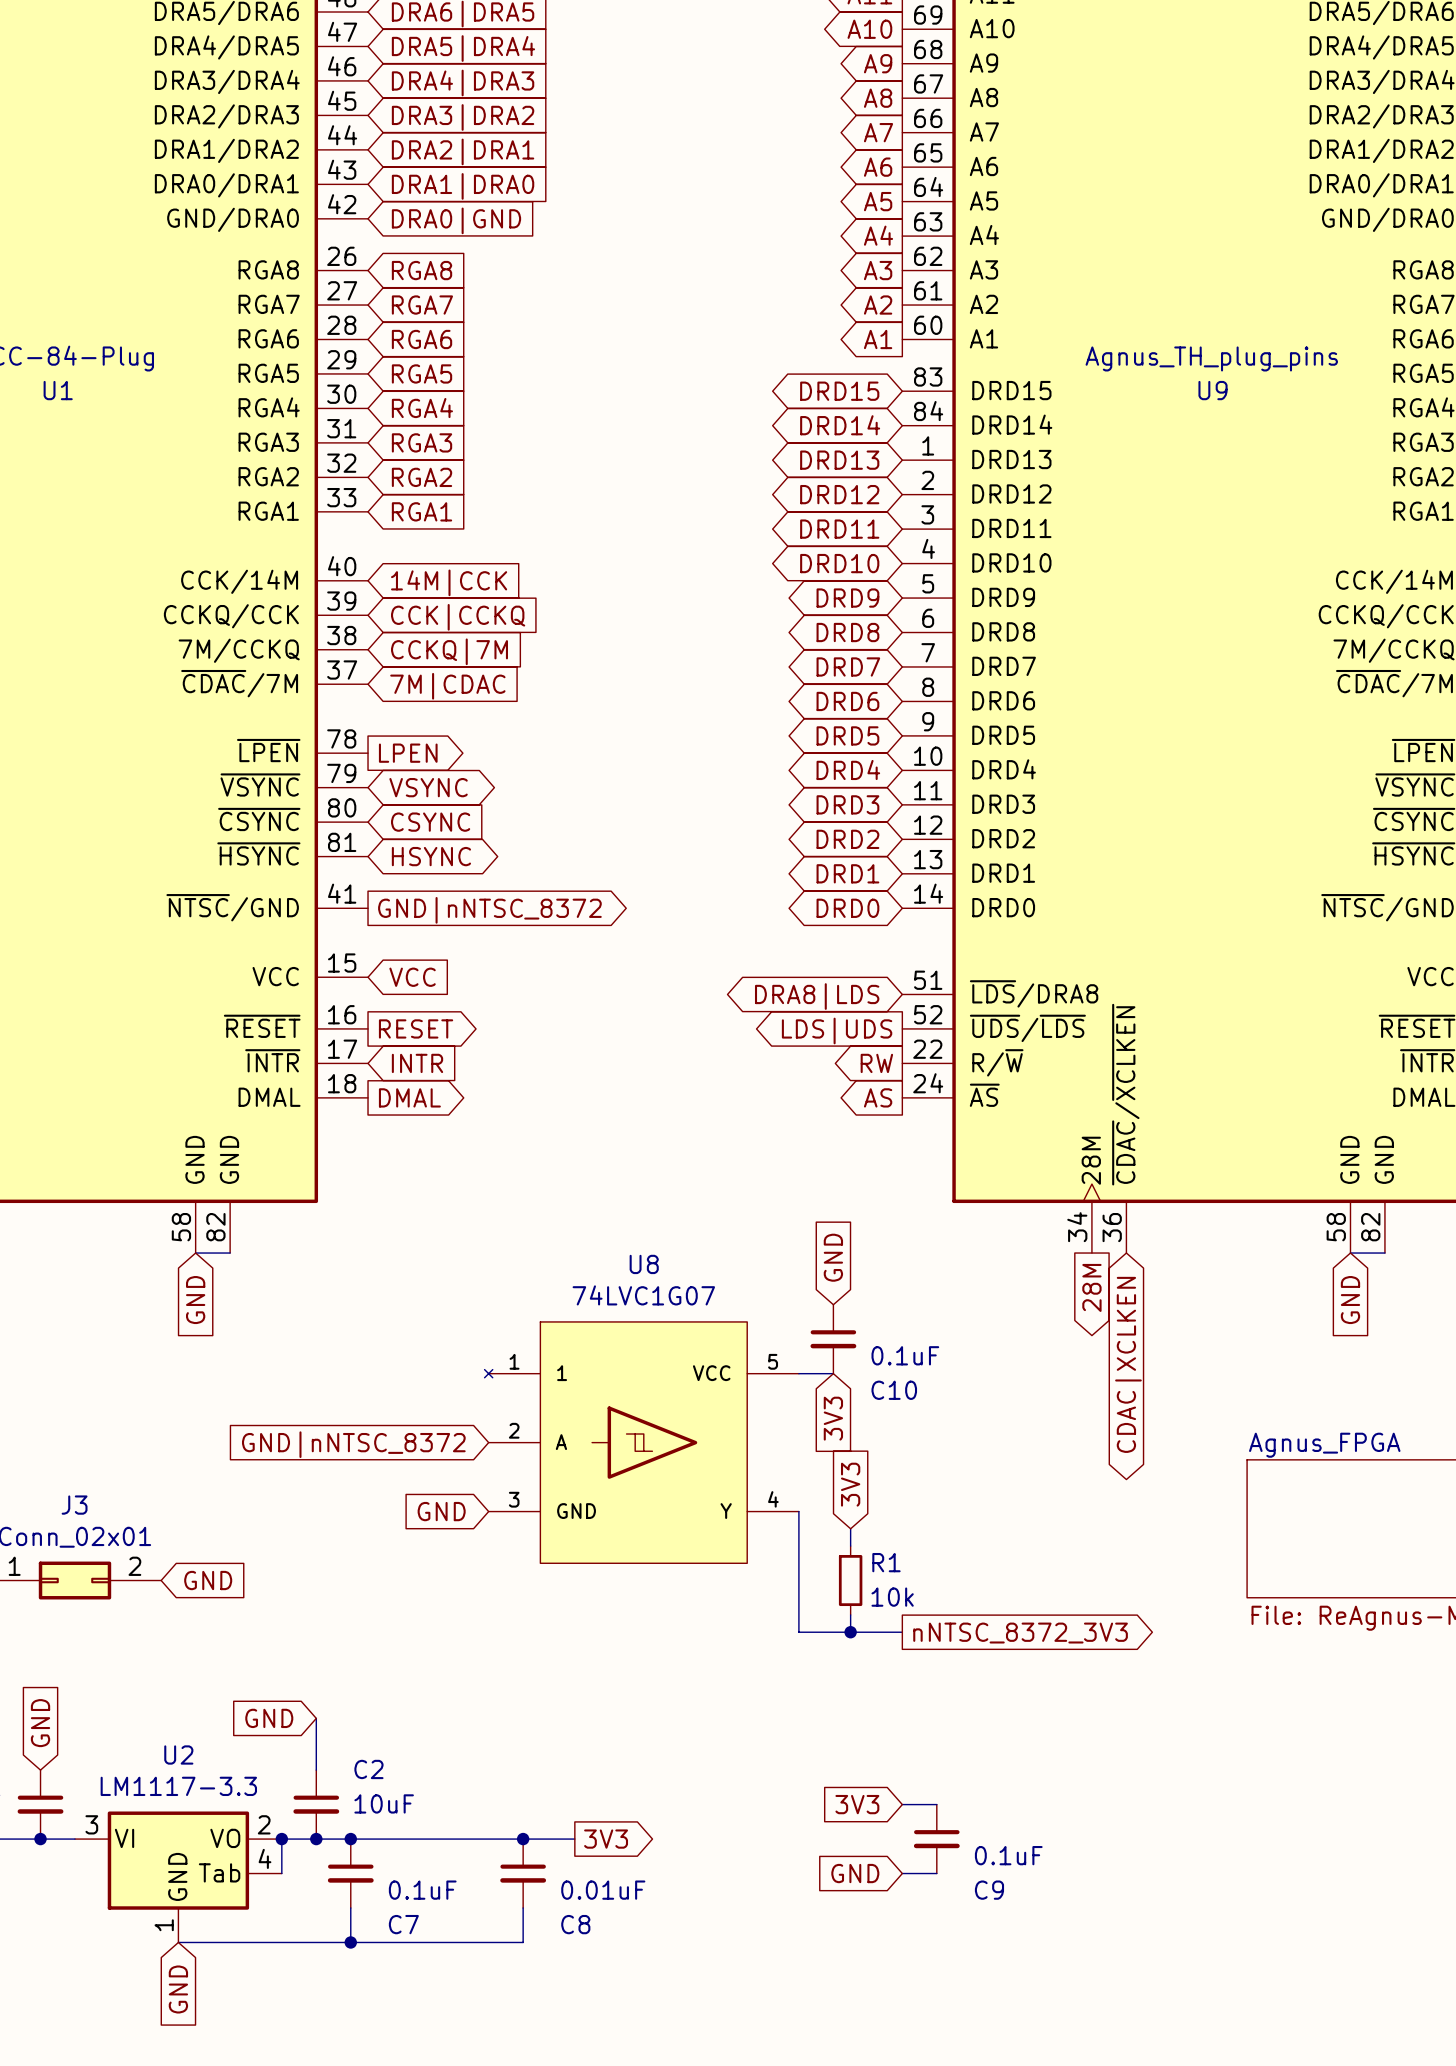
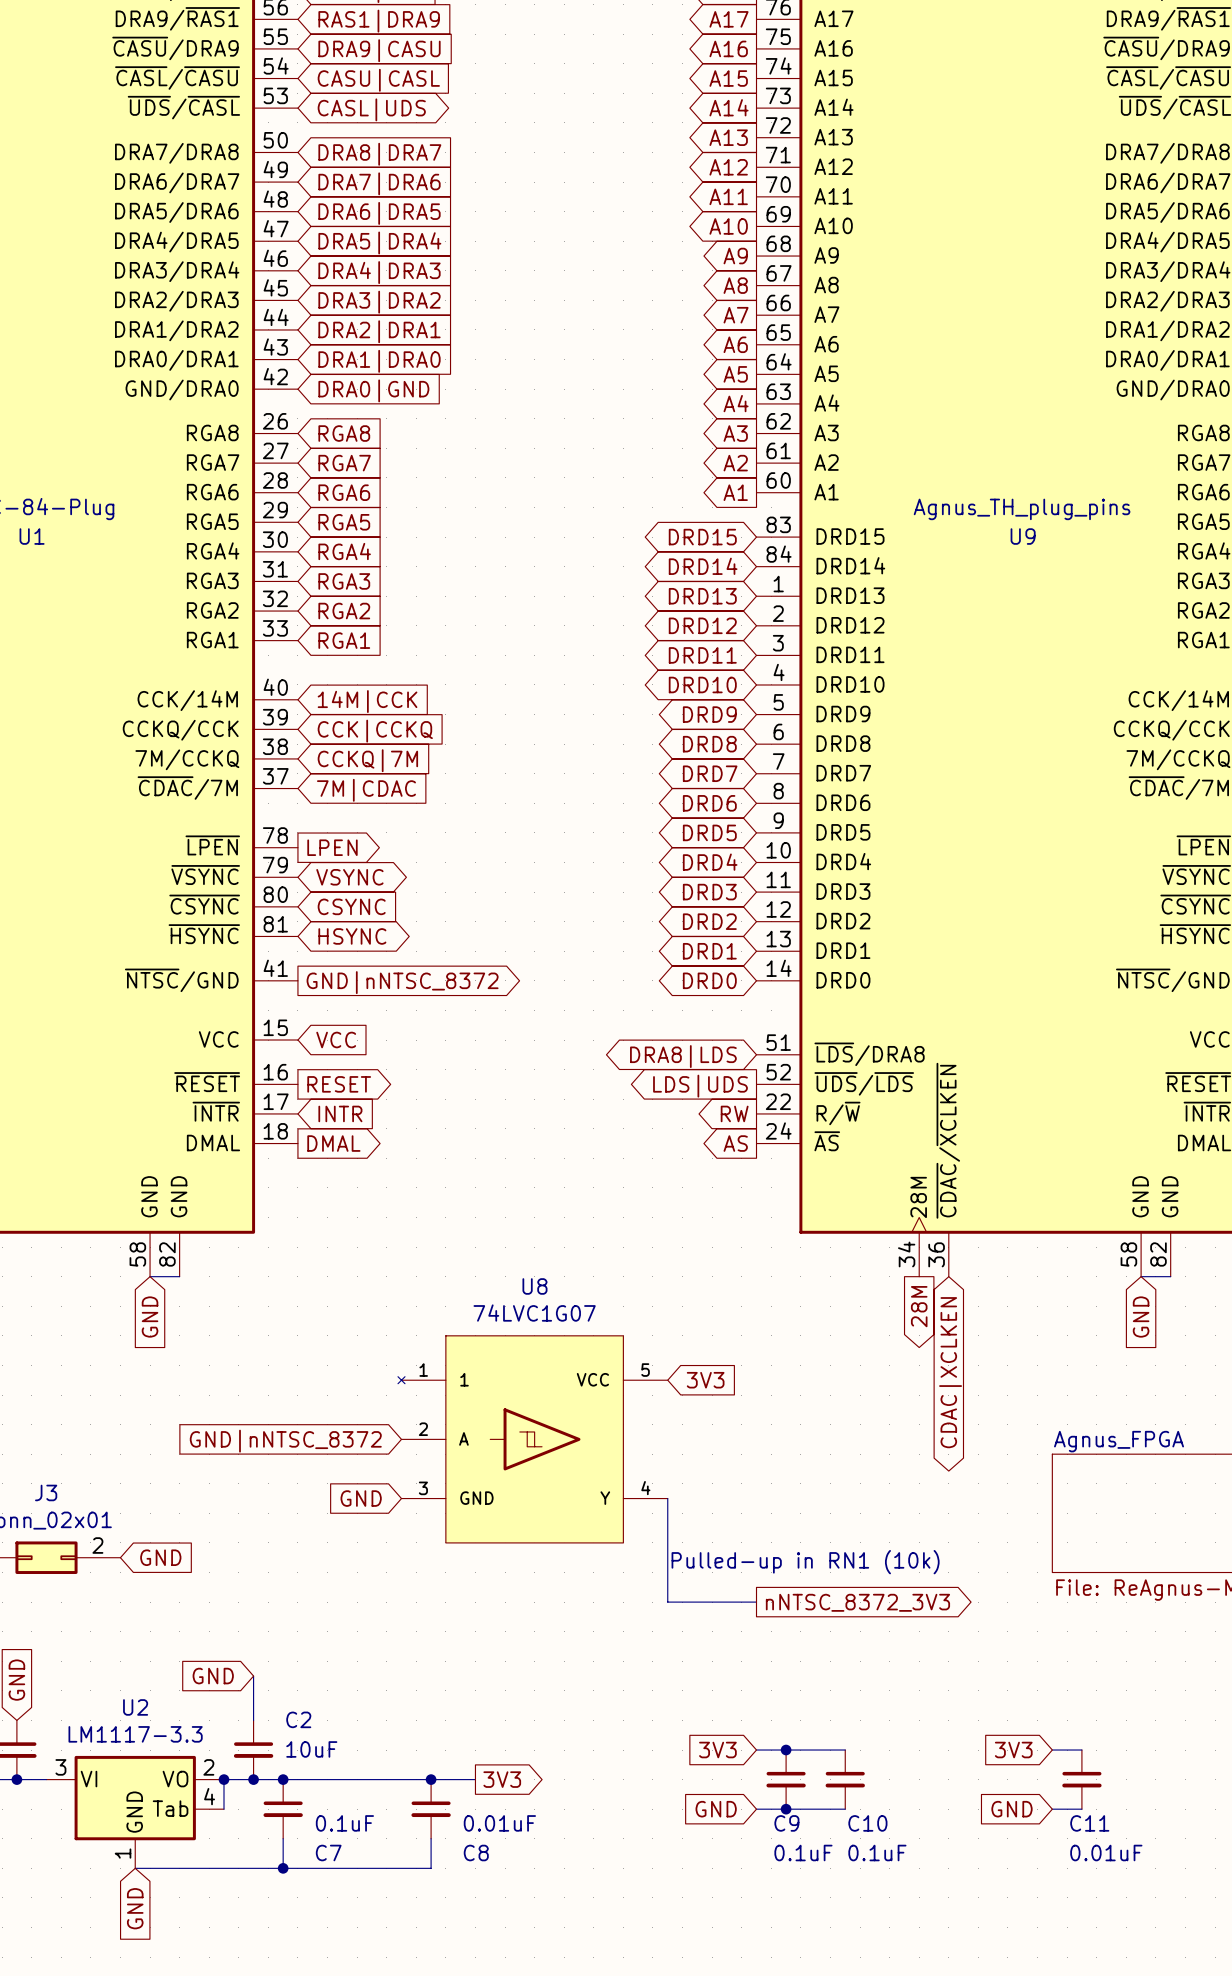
global label: GND (833, 1257) -> none
C10 position: (833, 1339) -> (845, 1779)
C10 value position: 0.1uF (905, 1355) -> 0.1uF (877, 1853)
wire: (798, 1373) (833, 1373) -> none
C10 name position: C10 (894, 1390) -> C10 (867, 1823)
global label rotation: 0° (833, 1418) -> 90° counterclockwise (705, 1380)
global label: 3V3 (850, 1484) -> none
wire: (850, 1528) (850, 1546) -> none
R1: 10k (850, 1580) -> none
text: none -> Pulled-up in RN1 (10k) (805, 1562)
wire: (850, 1614) (850, 1632) -> none
junction: (850, 1632) -> none
wire: none -> (786, 1750) (845, 1750)
junction: none -> (786, 1750)
global label: none -> 3V3 (1013, 1750)
wire: none -> (1052, 1750) (1081, 1750)
C11: none -> 0.01uF (1081, 1779)
C9 value position: 0.1uF (1008, 1855) -> 0.1uF (803, 1853)
wire: none -> (786, 1809) (845, 1809)
junction: none -> (786, 1809)
global label: none -> GND (1011, 1809)
wire: none -> (1052, 1809) (1081, 1809)
C9 name position: C9 (989, 1890) -> C9 (786, 1823)

